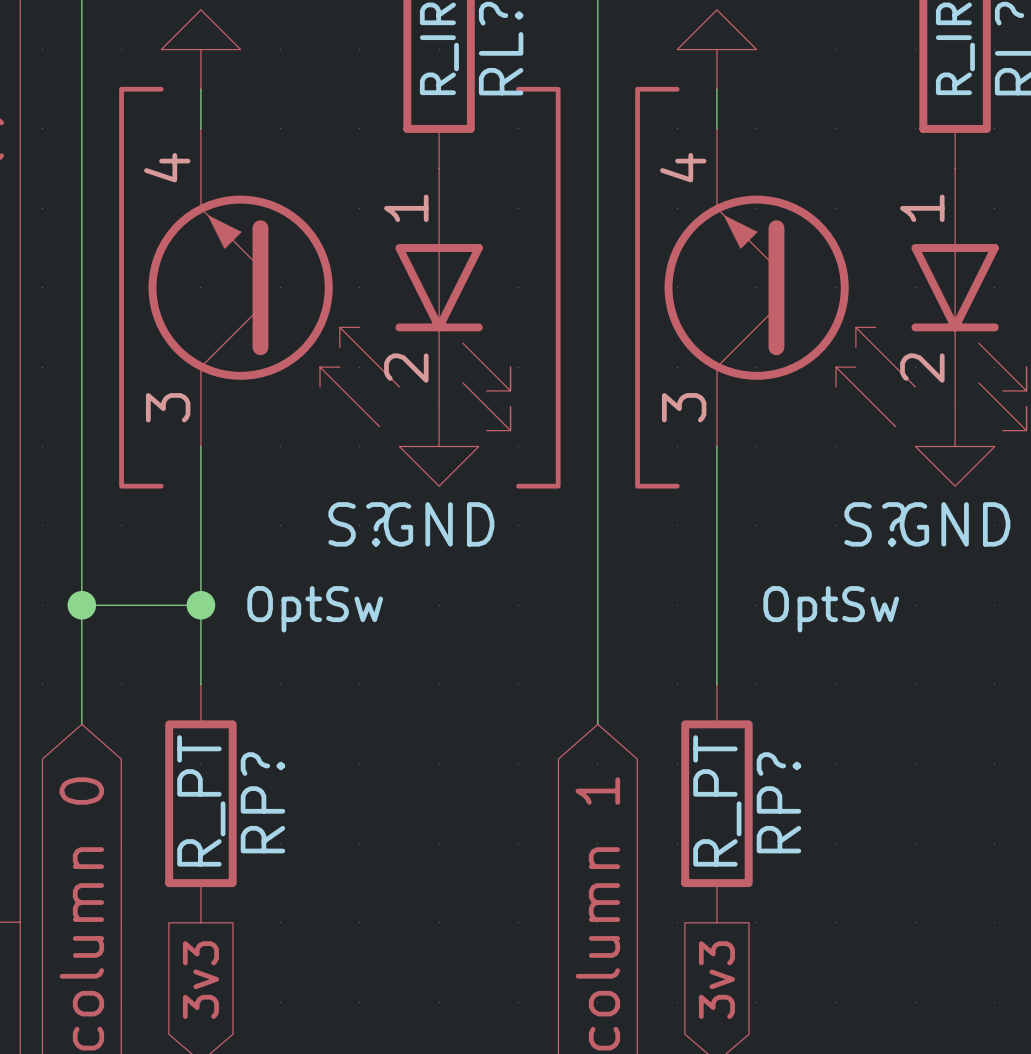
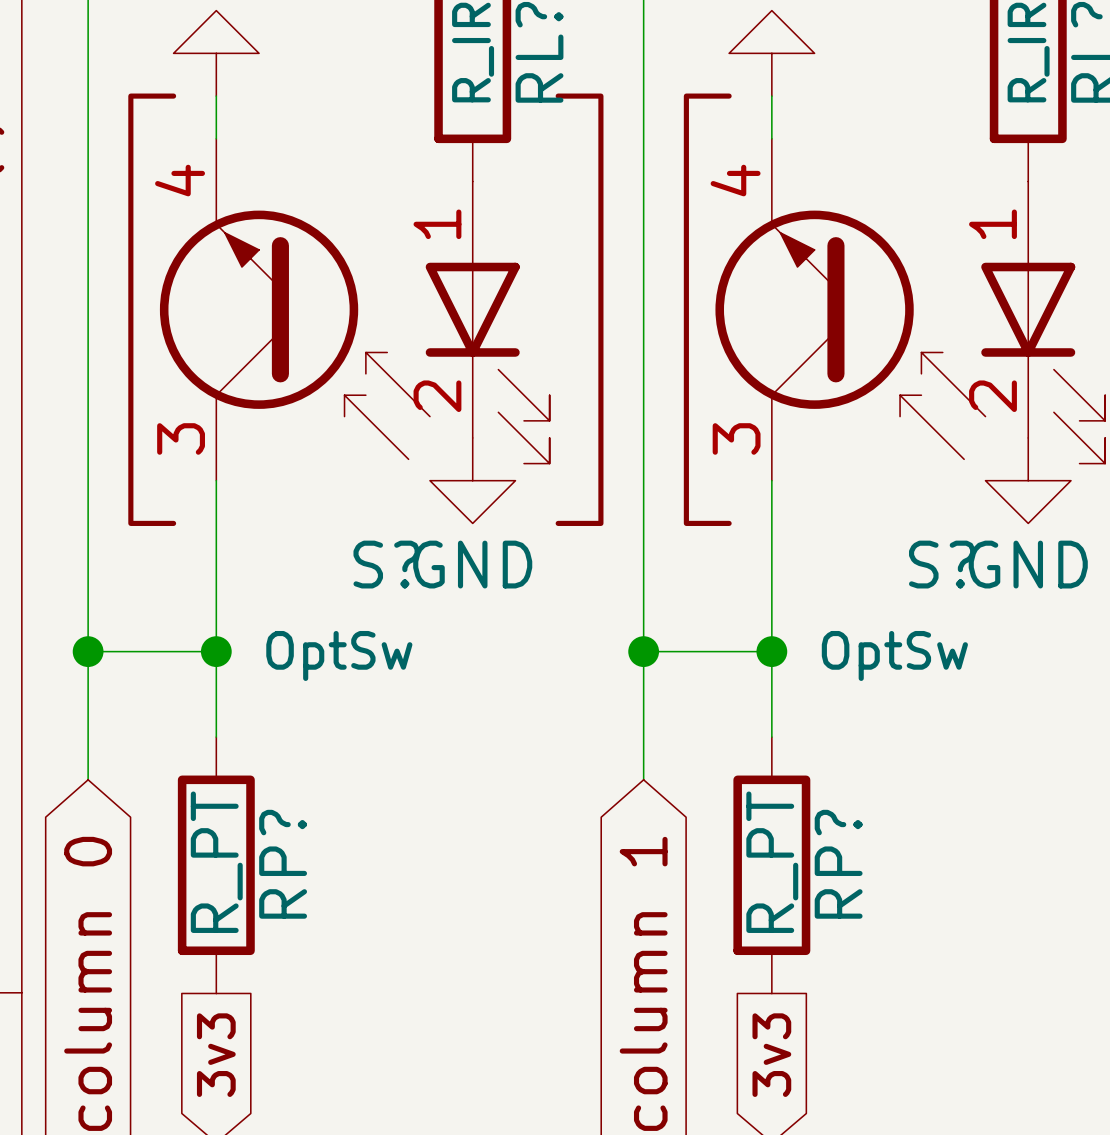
wire: none -> (643, 651) (771, 651)
junction: none -> (643, 651)
junction: none -> (771, 651)

